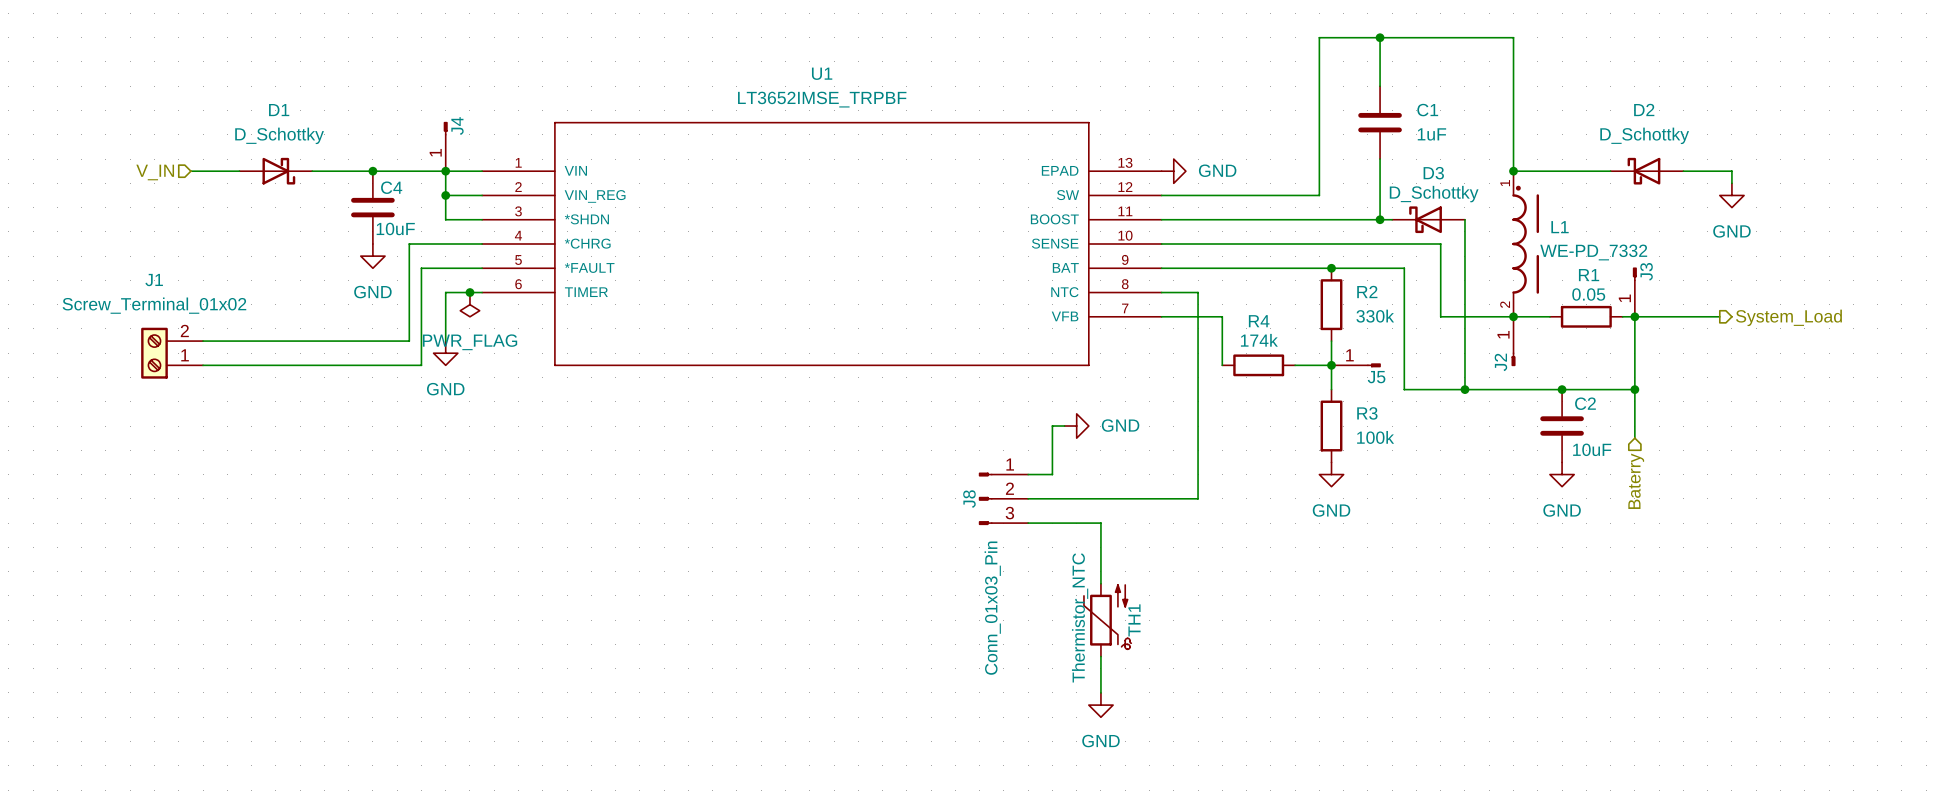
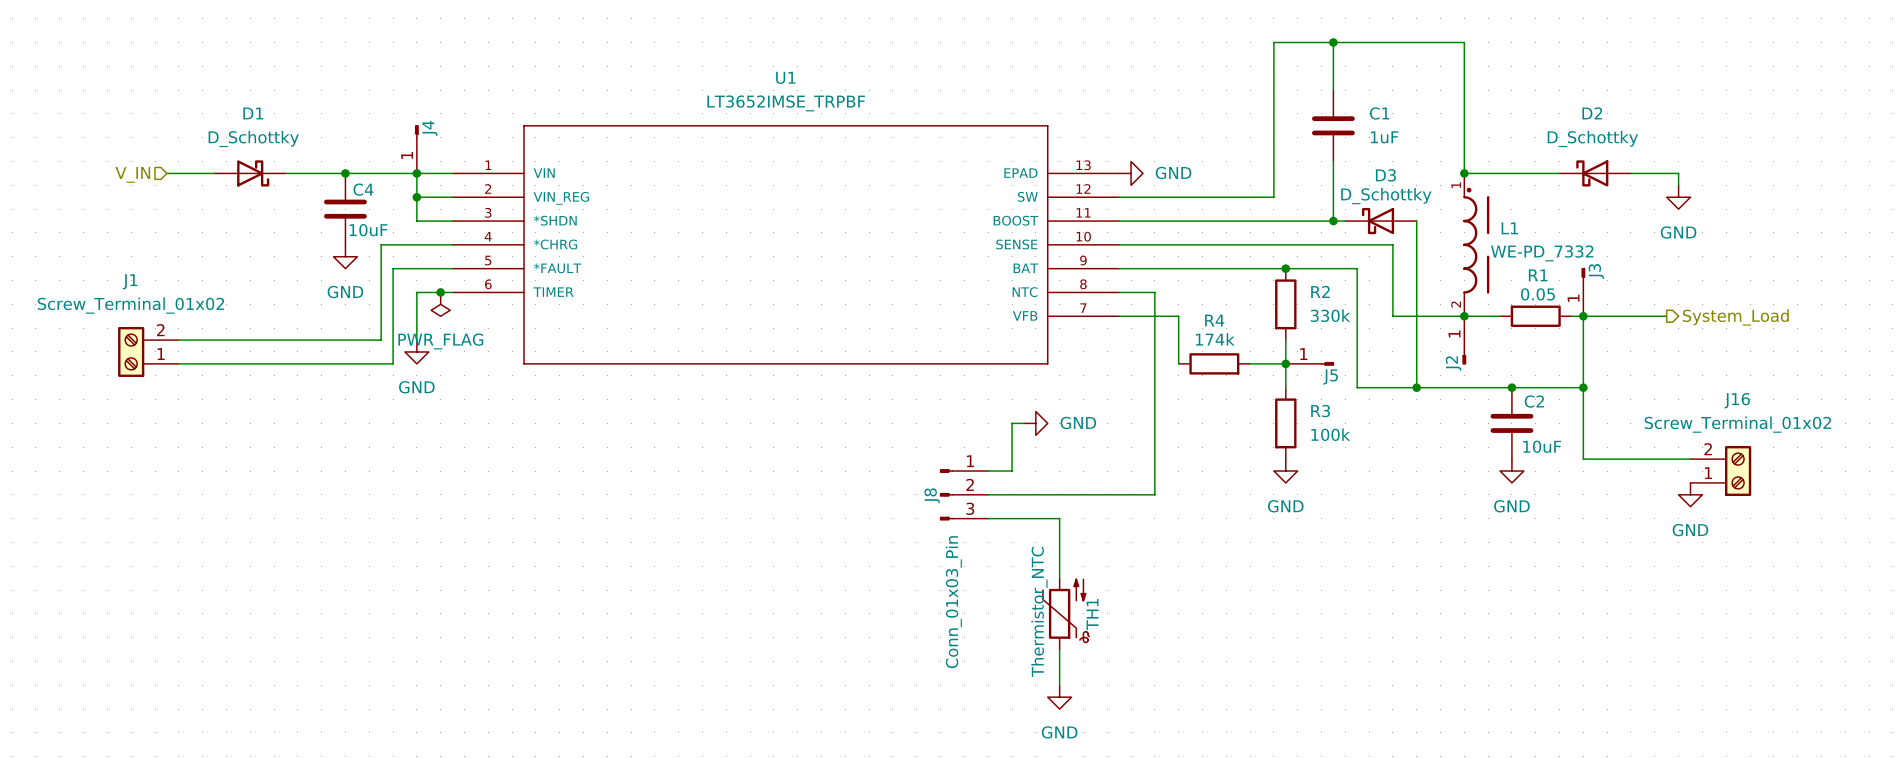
wire: none -> (1583, 435) (1583, 459) (1690, 459)
J16: none -> Screw_Terminal_01x02 (1720, 471)
hierarchical label: Baterry (1636, 481) -> none
power symbol: none -> GND (1690, 494)

